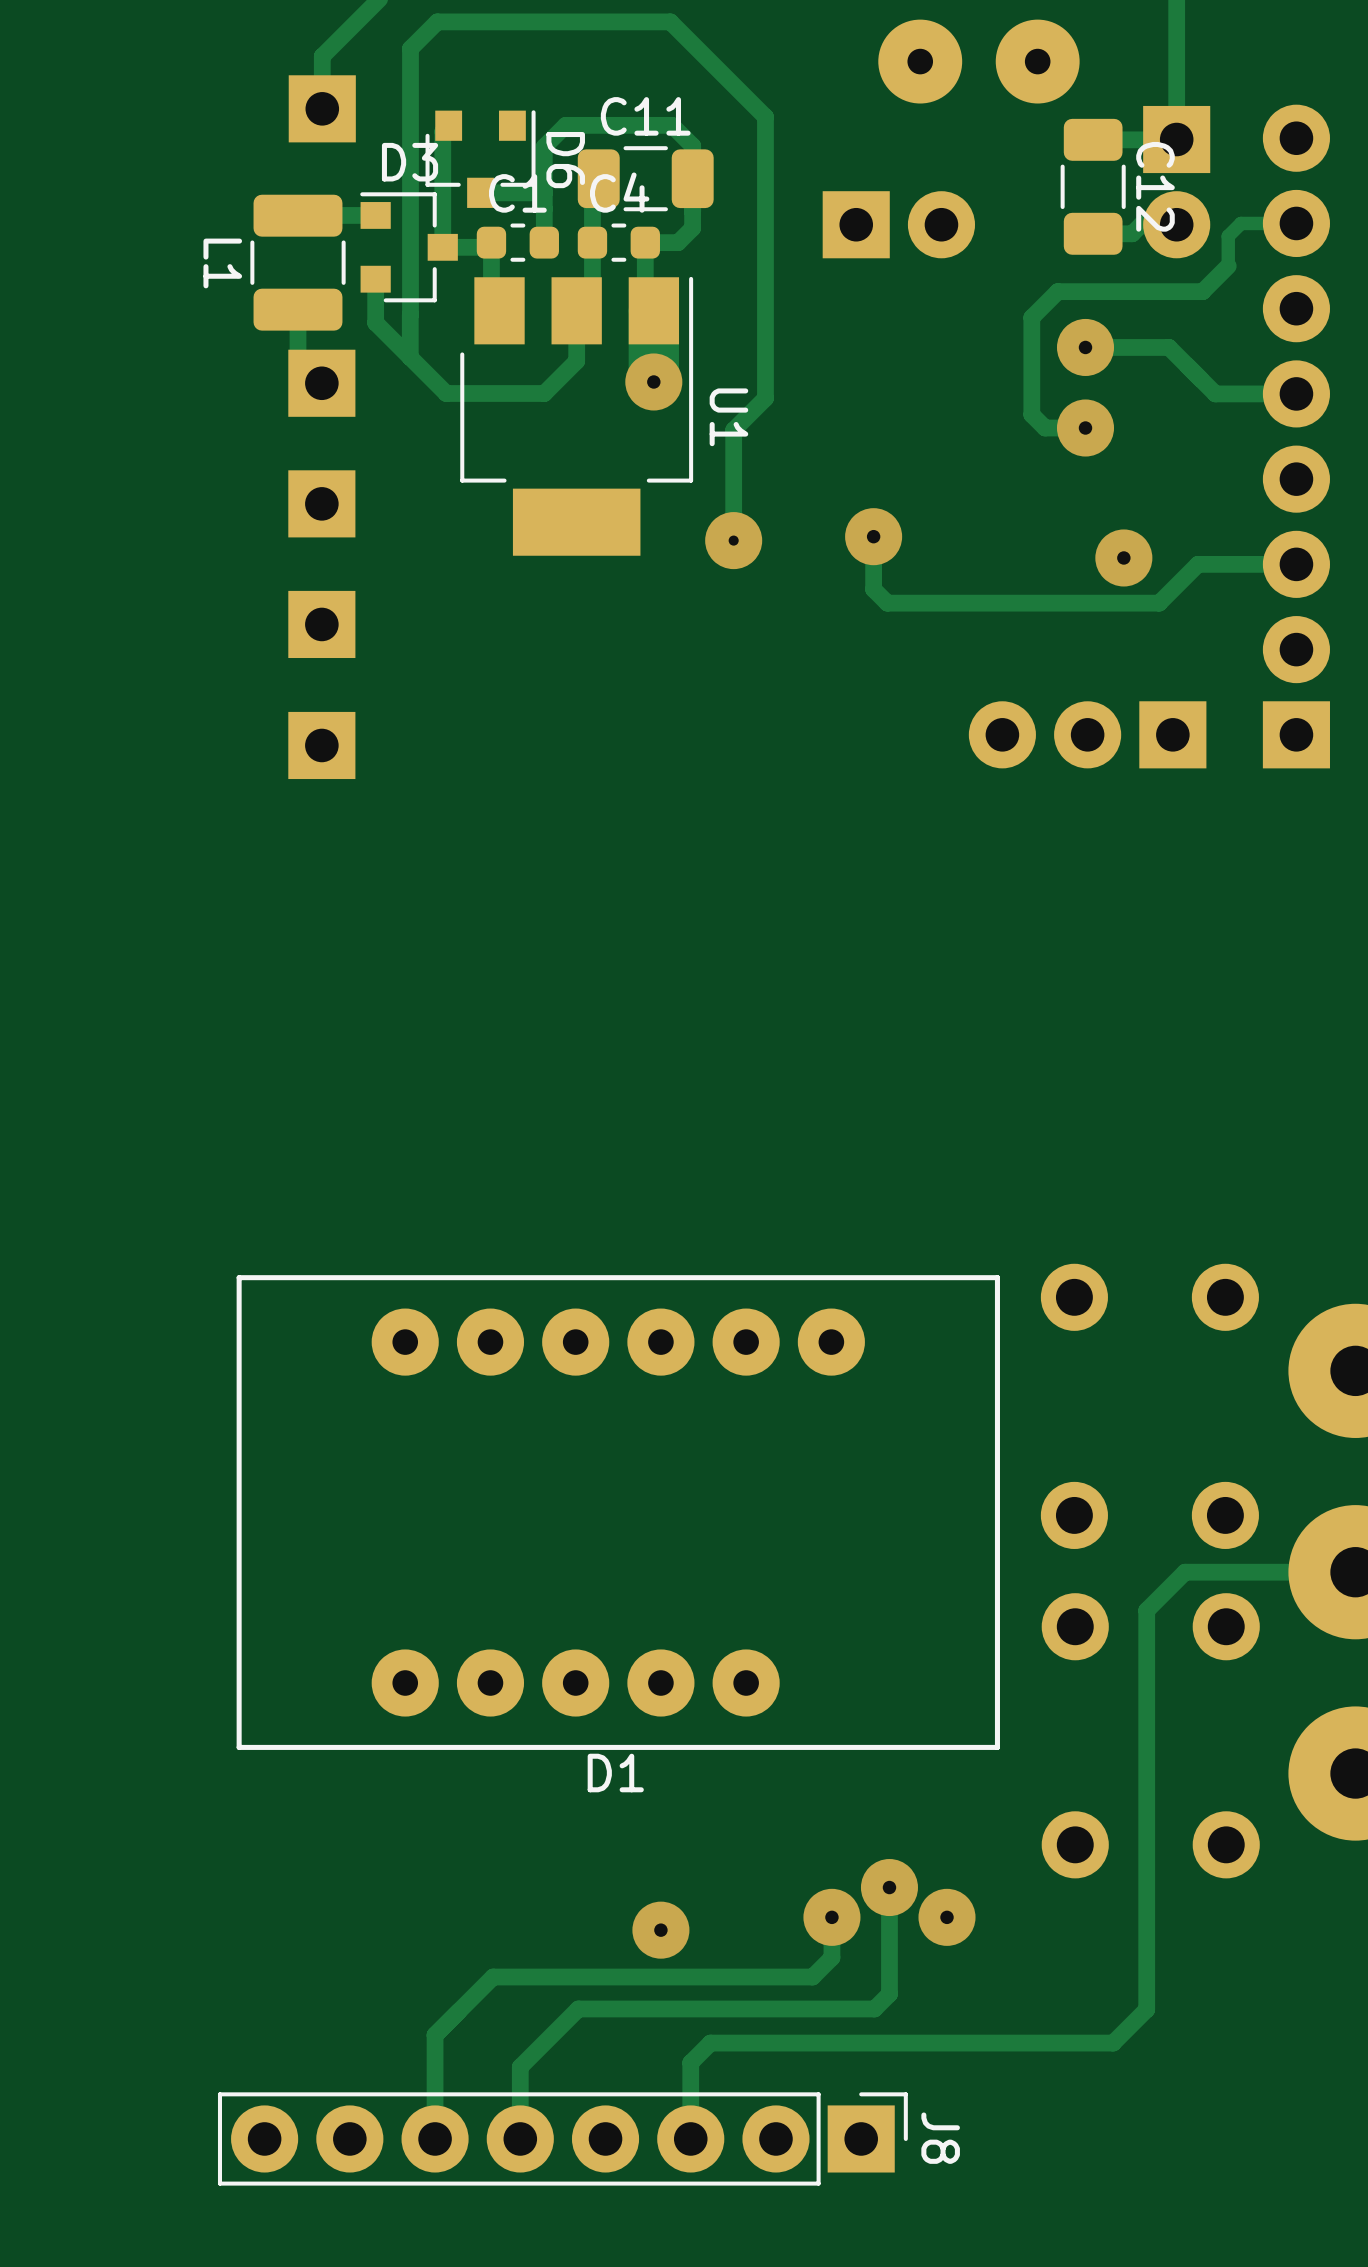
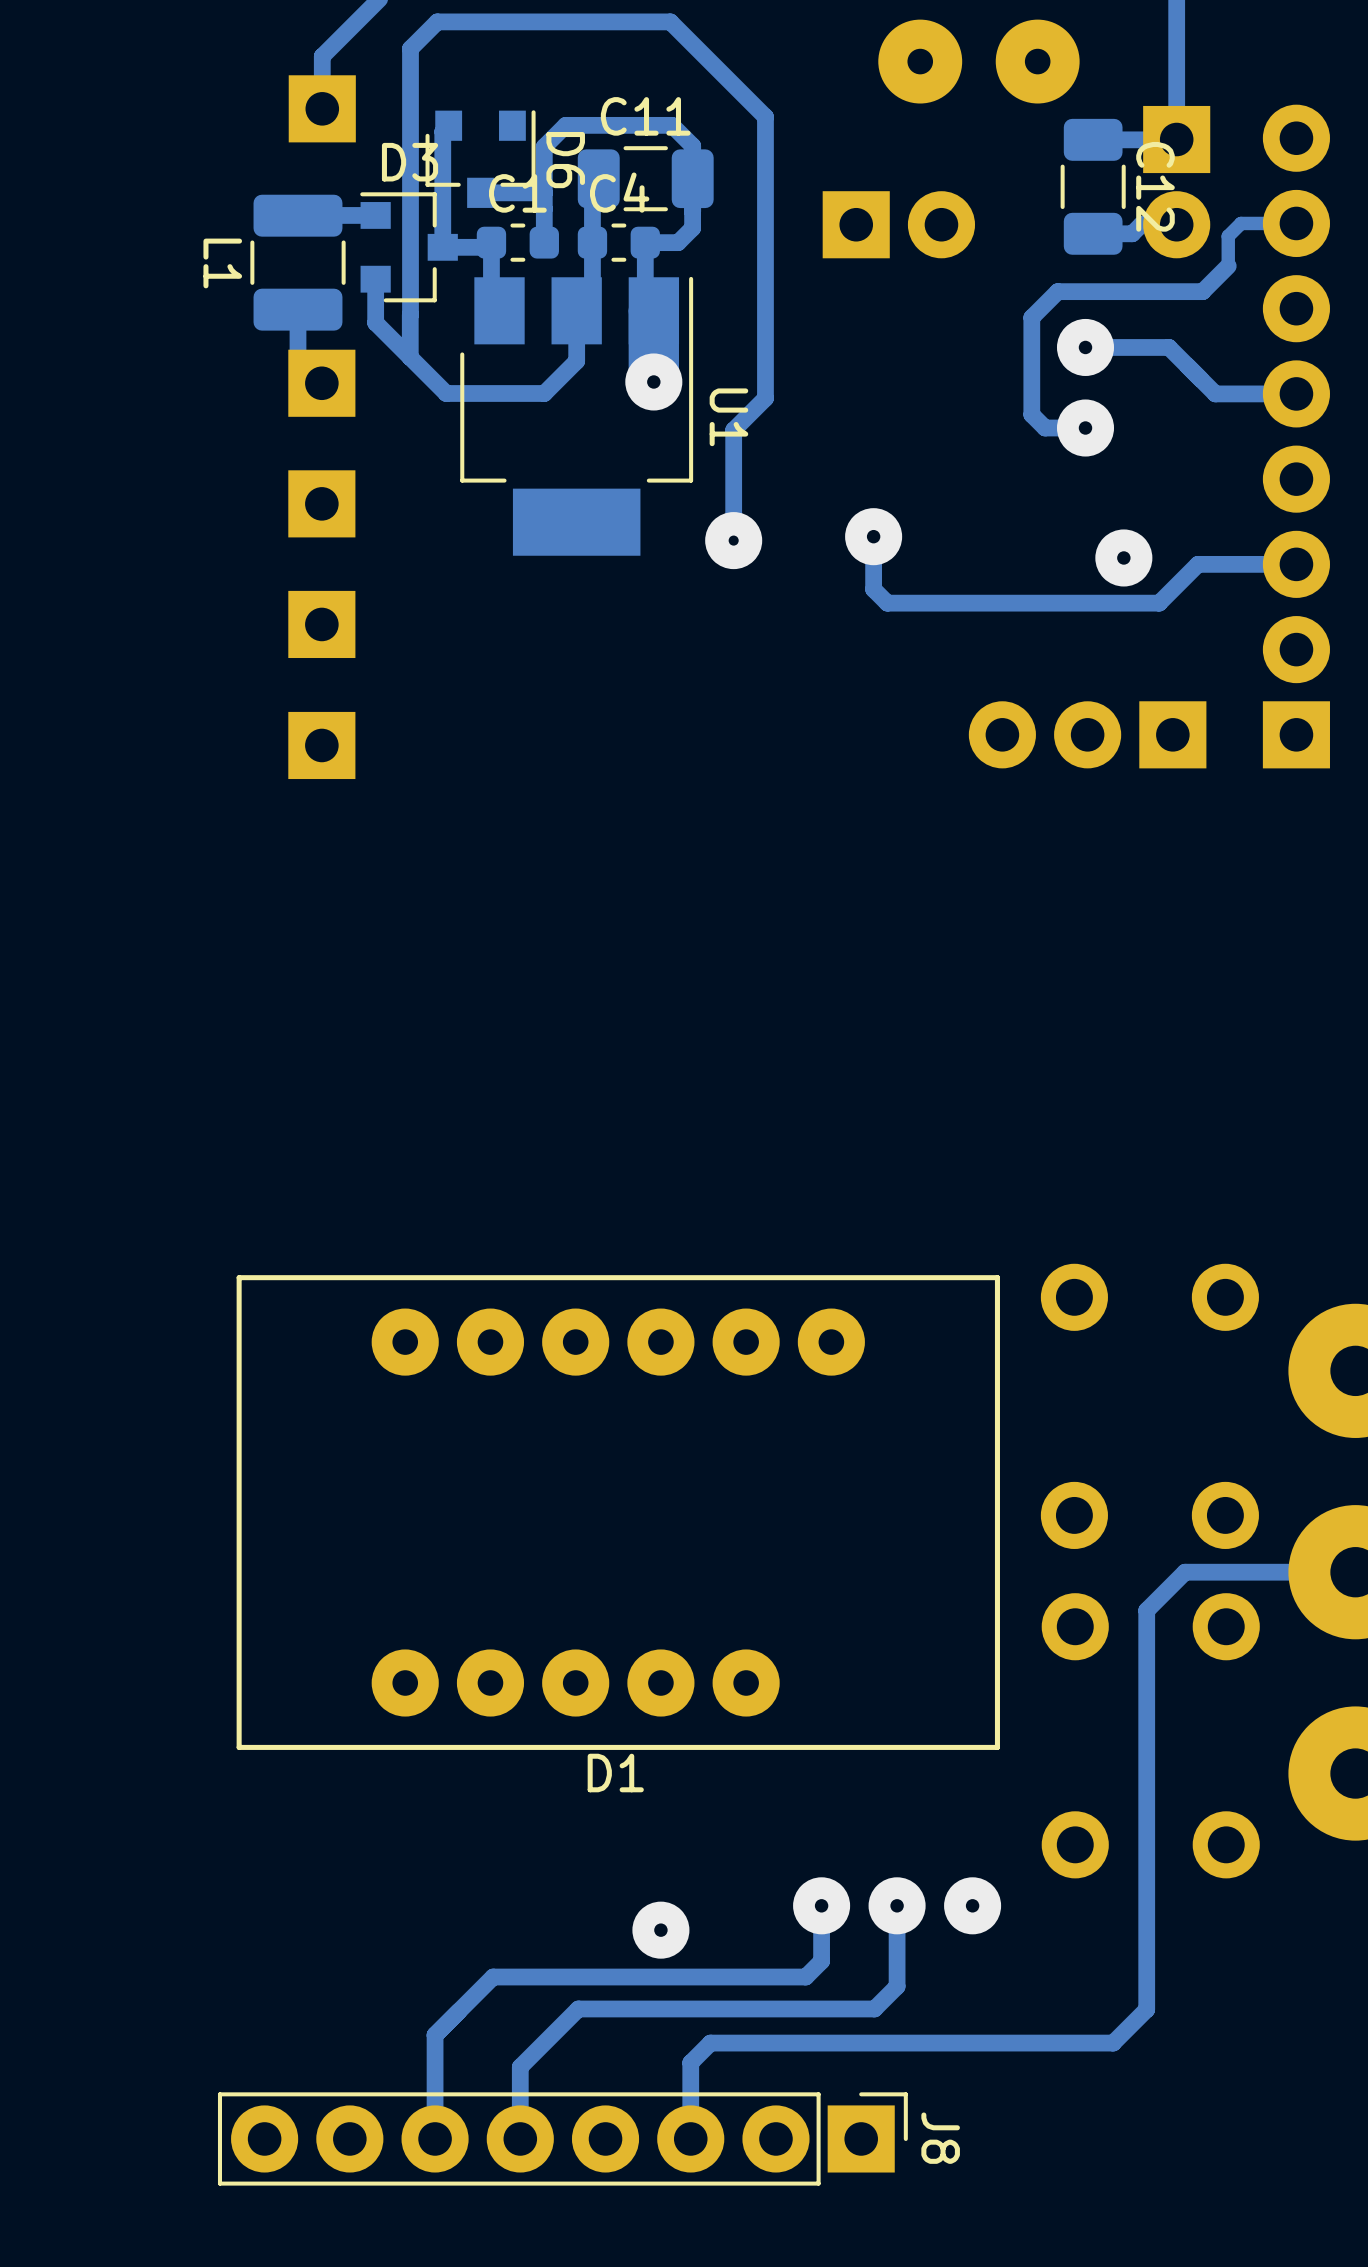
track: (889, 1887) (889, 1994) -> (897, 1905) (897, 1986) (889, 1994)
via position: (889, 1887) -> (897, 1905)
track: (831, 1917) (831, 1957) (812, 1977) (805, 1977) -> (821, 1905) (821, 1961) (805, 1977)
via position: (831, 1917) -> (821, 1905)
via position: (947, 1917) -> (972, 1905)

